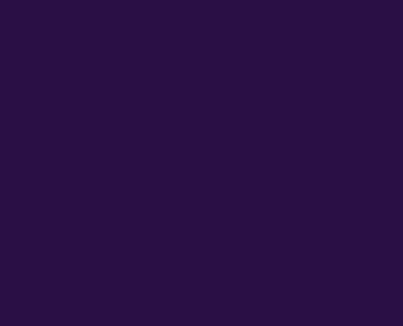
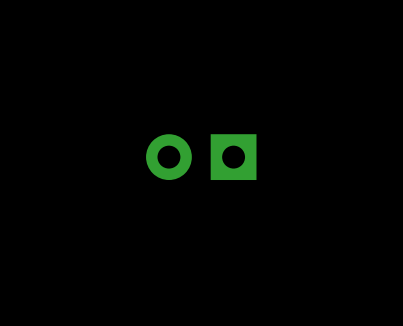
part: none -> (201, 157)

